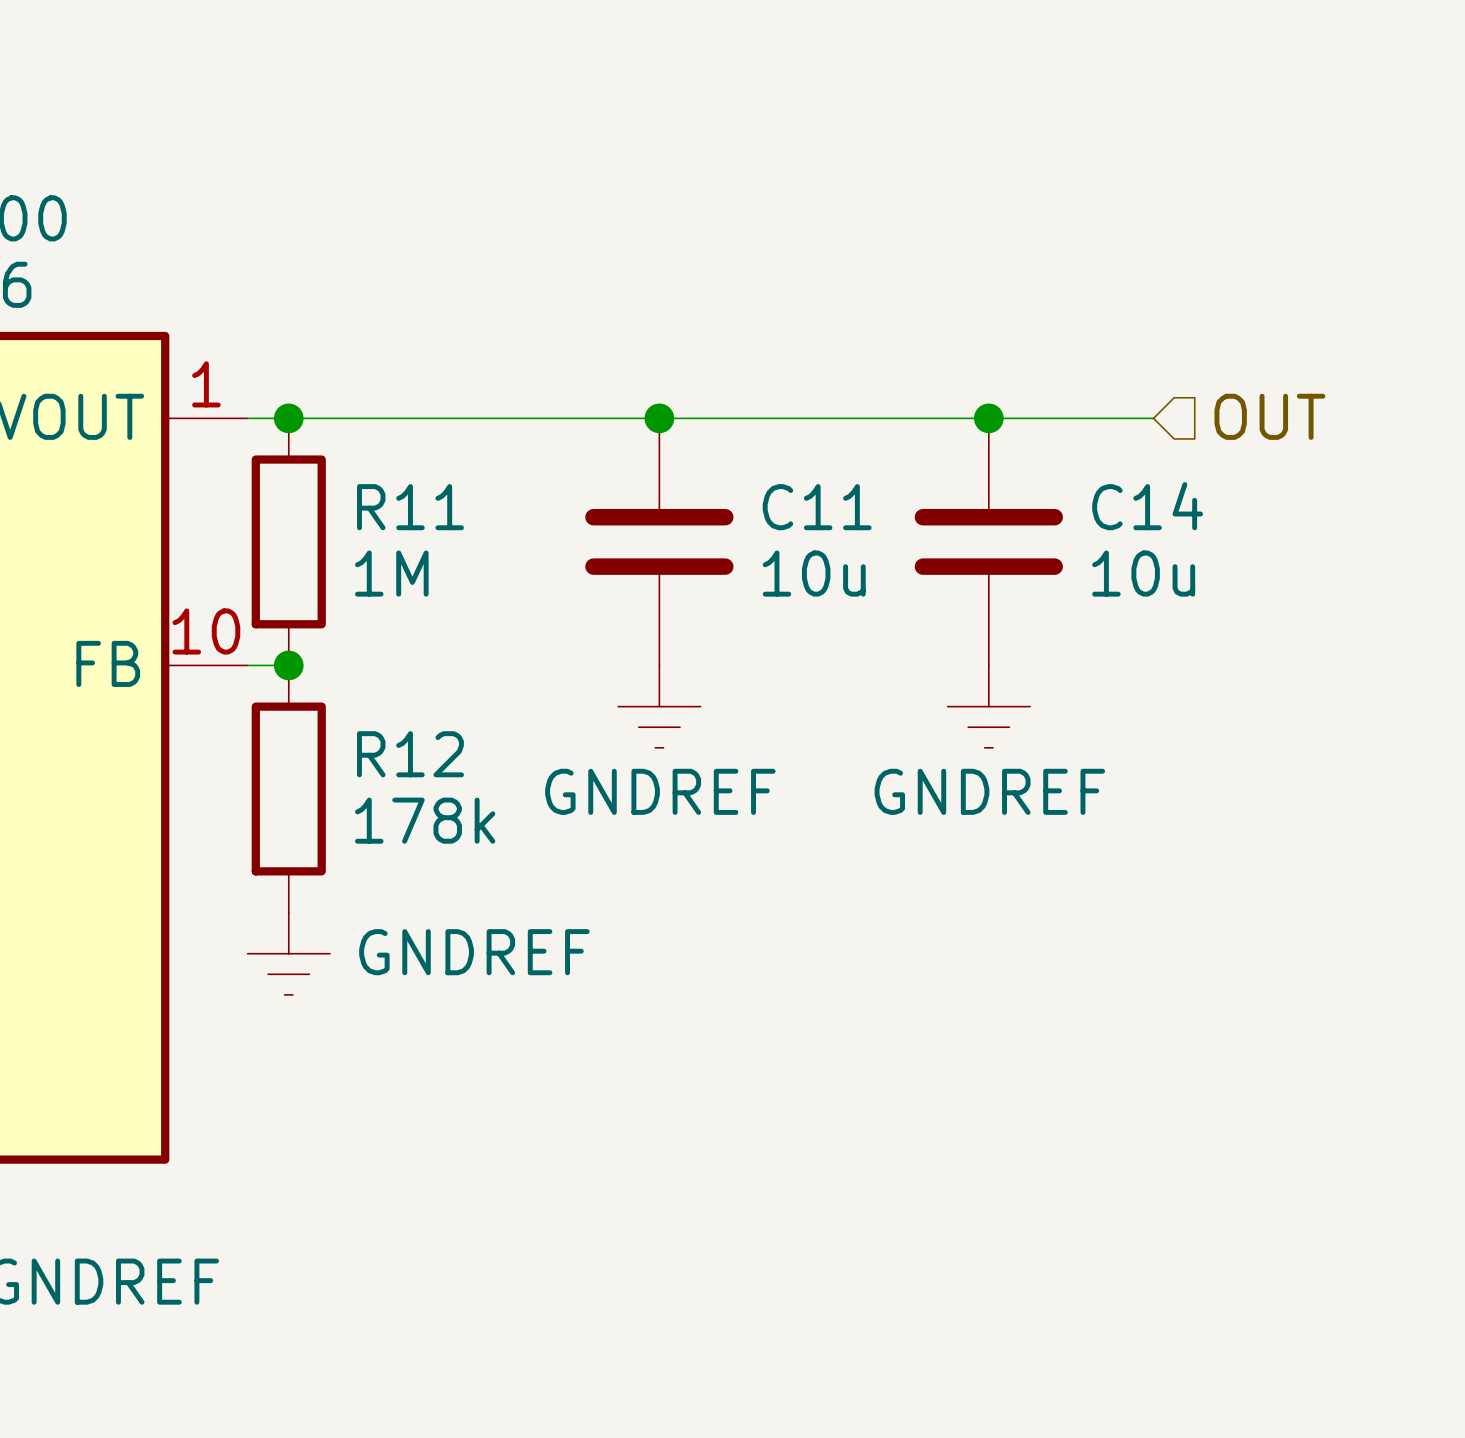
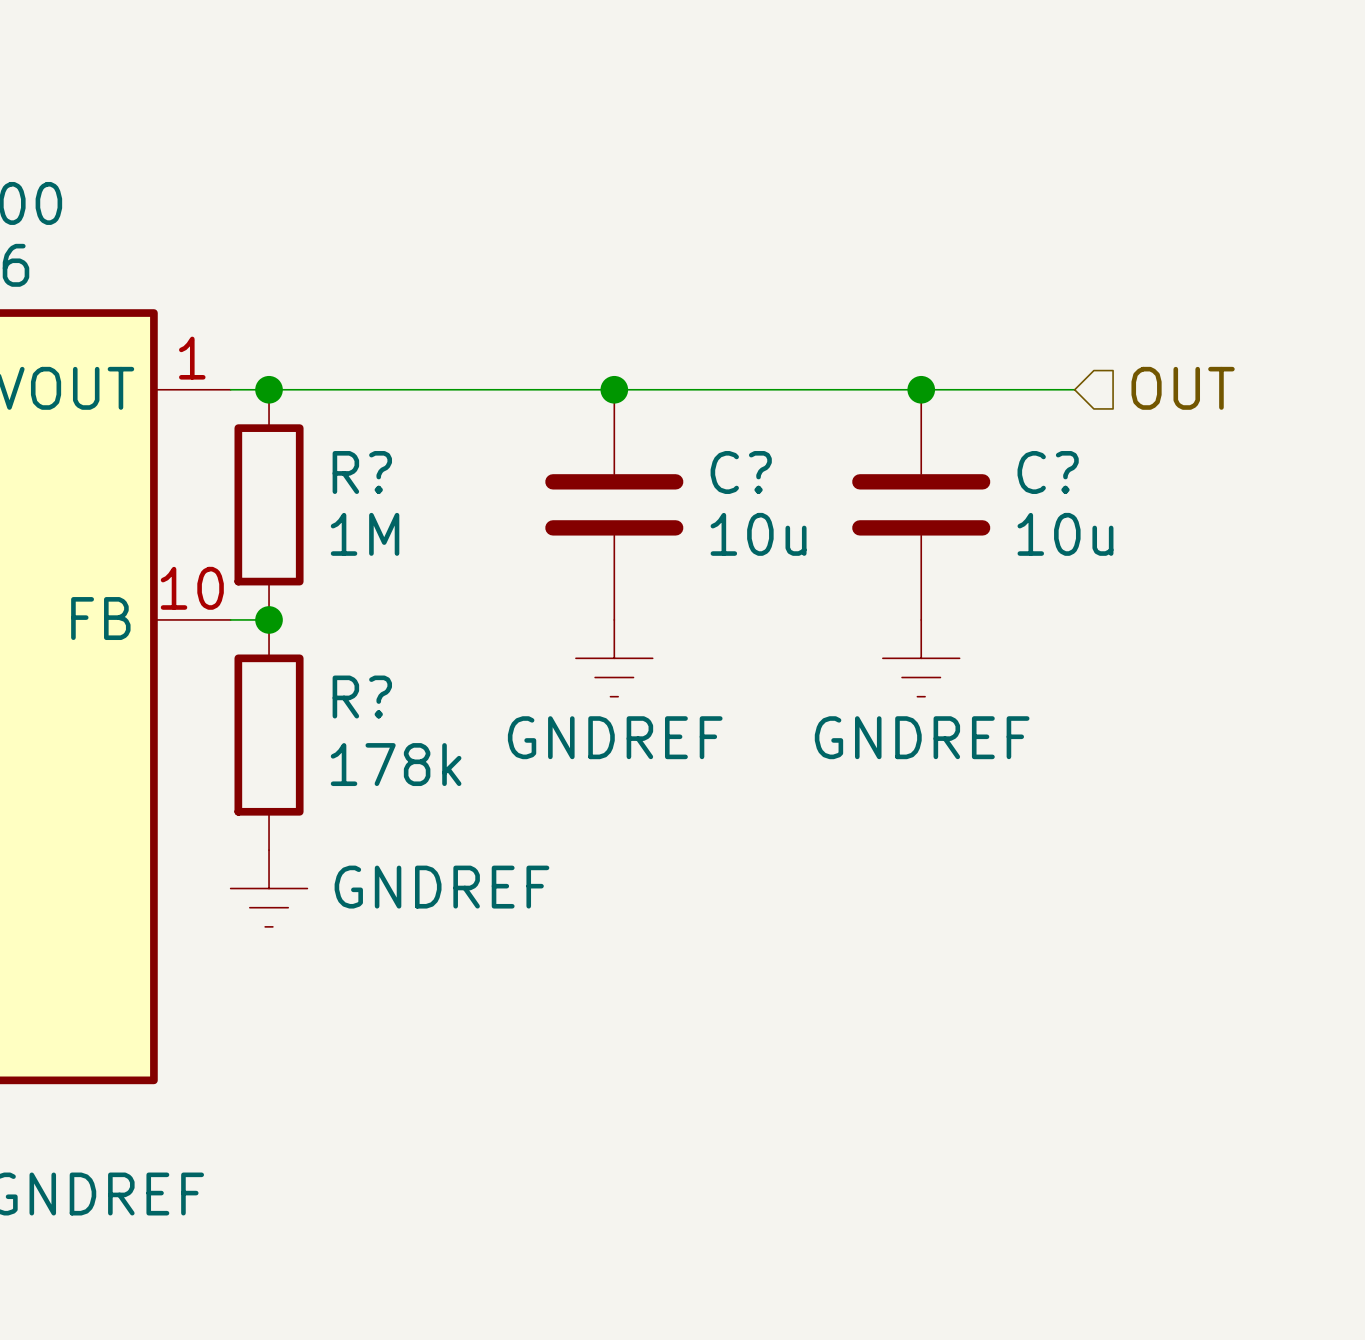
C14 name: C14 (1147, 506) -> C? (1048, 472)
R11 name: R11 (410, 507) -> R? (362, 472)
C11 name: C11 (817, 507) -> C? (741, 472)
R12 name: R12 (410, 754) -> R? (362, 697)

